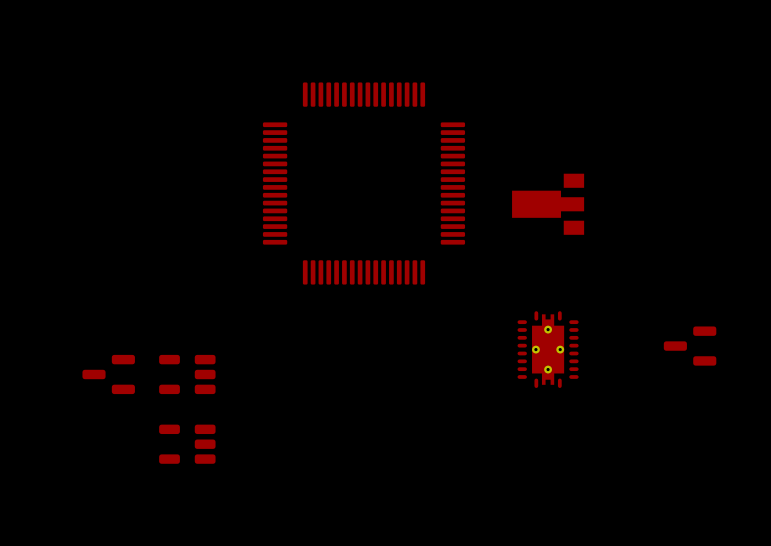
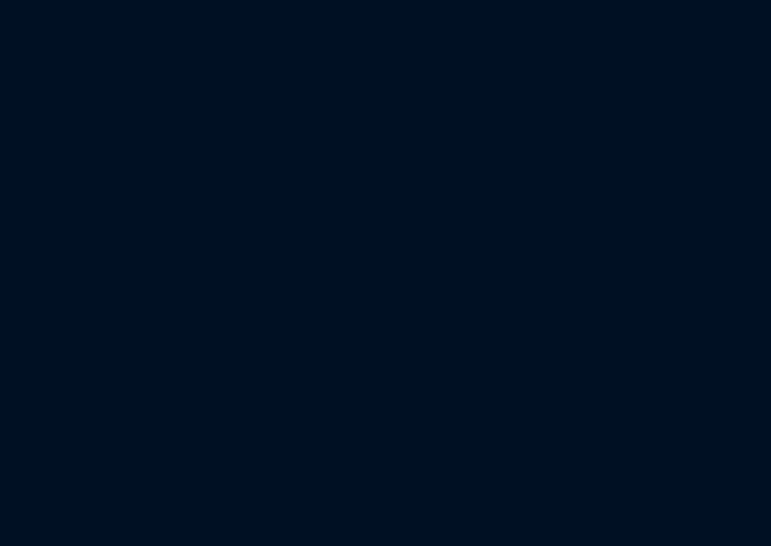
part: (363, 183) -> none
part: (548, 204) -> none
part: (690, 346) -> none
part: (548, 349) -> none
part: (108, 374) -> none
part: (187, 374) -> none
part: (187, 444) -> none

